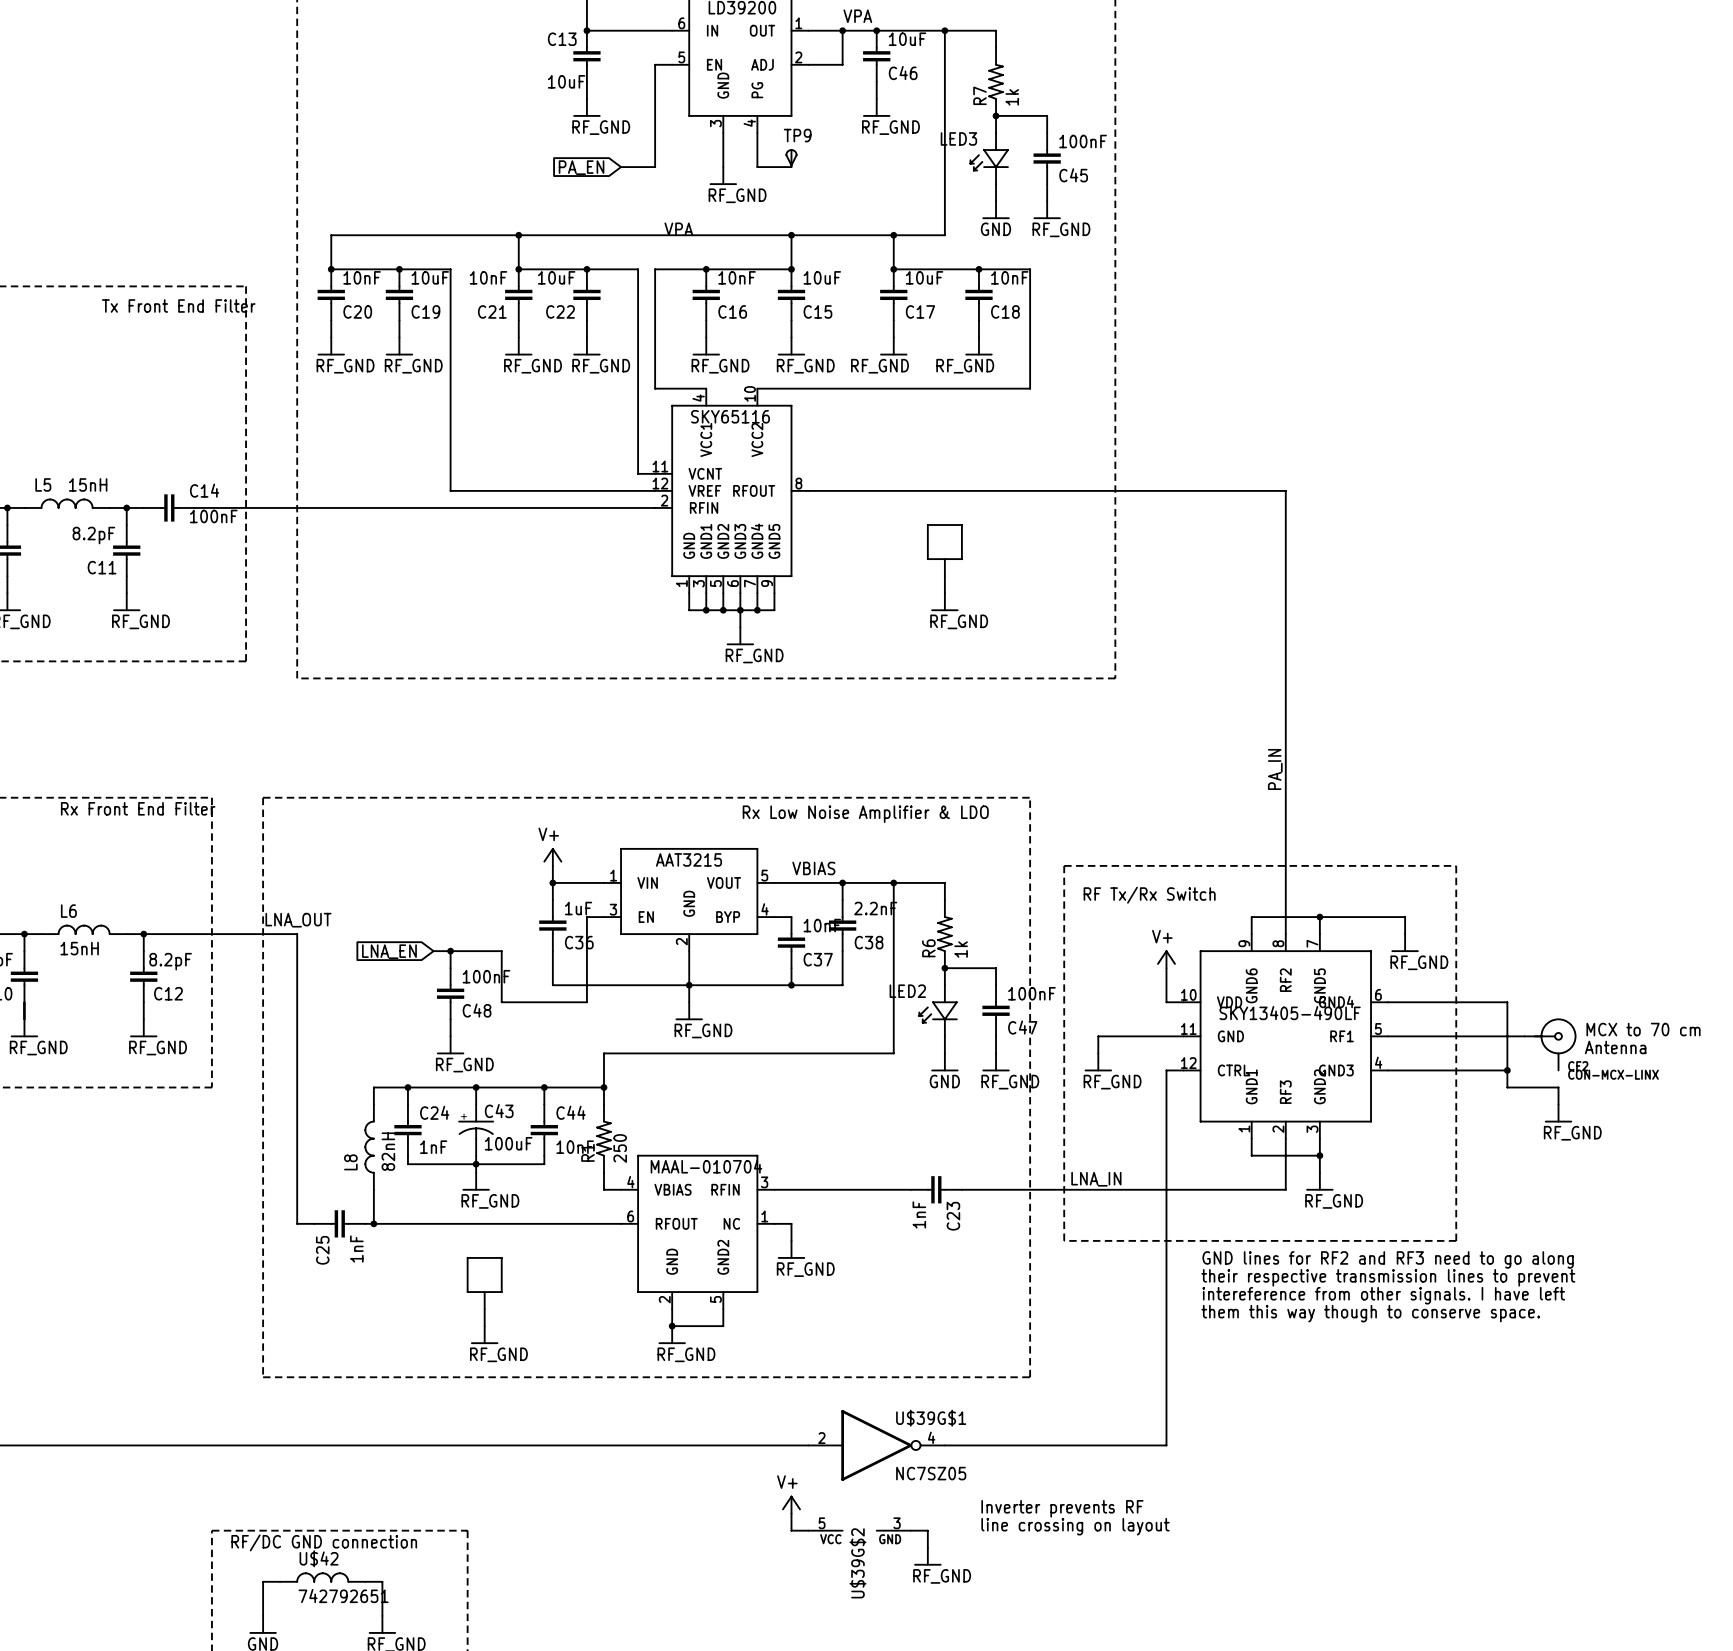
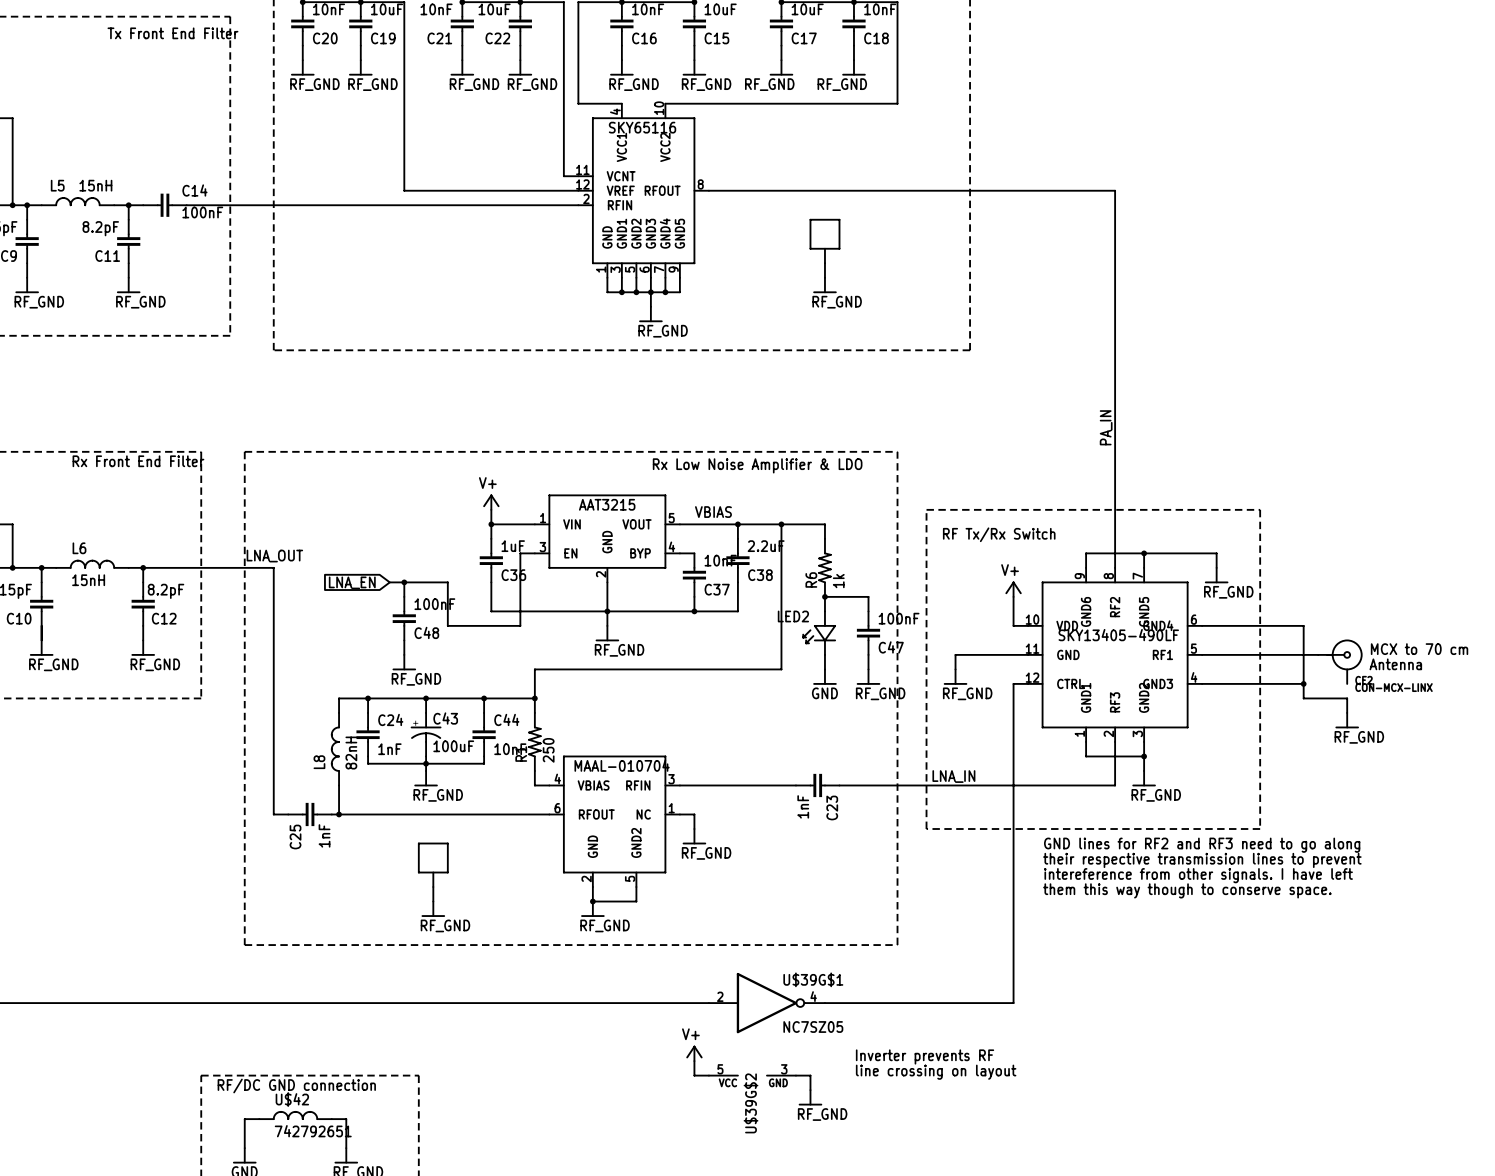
C38 value: 2.2nF (875, 908) -> 2.2uF (766, 546)

